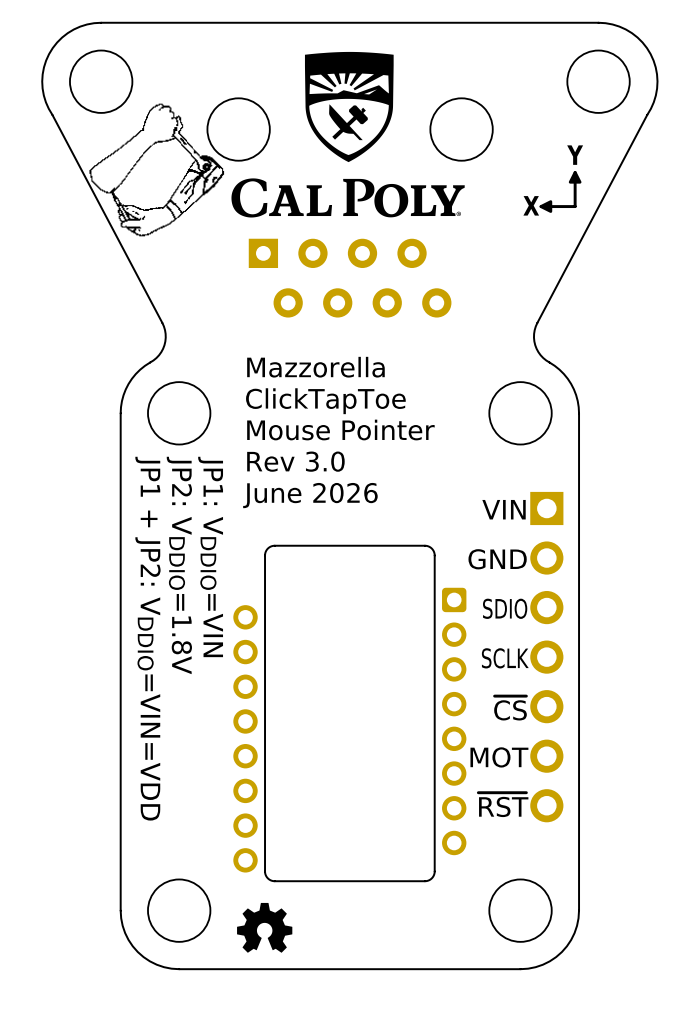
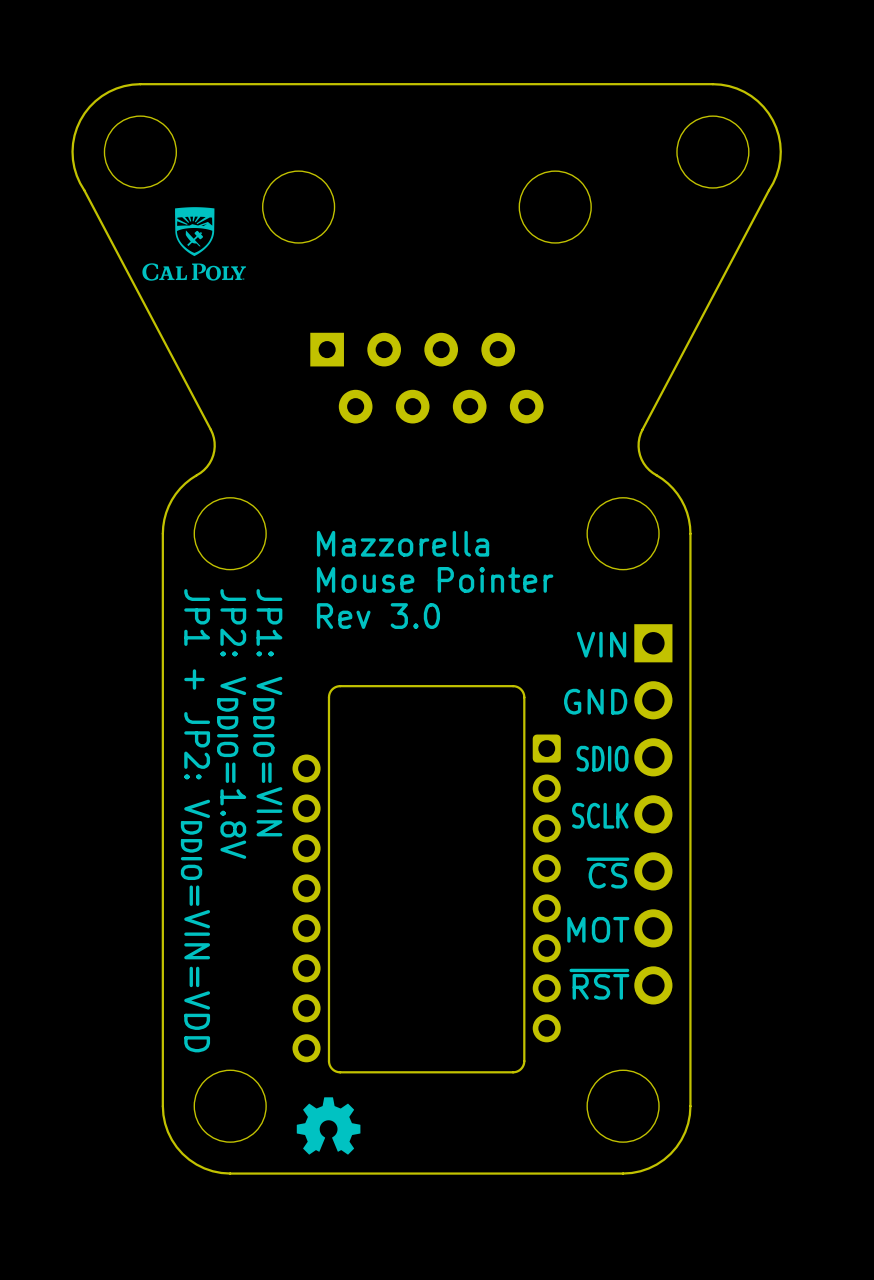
drawing: [89, 51, 465, 237] -> none
drawing: none -> [142, 207, 247, 281]
text: Y (575, 155) -> none
drawing: [568, 170, 582, 184] -> none
line: (575, 172) (575, 206) (541, 206) -> none
drawing: [539, 200, 553, 213] -> none
text: X (531, 205) -> none
text: Mazzorella (315, 367) -> none
text: ClickTapToe (325, 401) -> none
text: Mouse Pointer (340, 430) -> Mazzorella (403, 543)
text: Rev 3.0 (295, 461) -> Mouse Pointer (435, 579)
text: June 2026 (310, 495) -> Rev 3.0 (378, 616)

